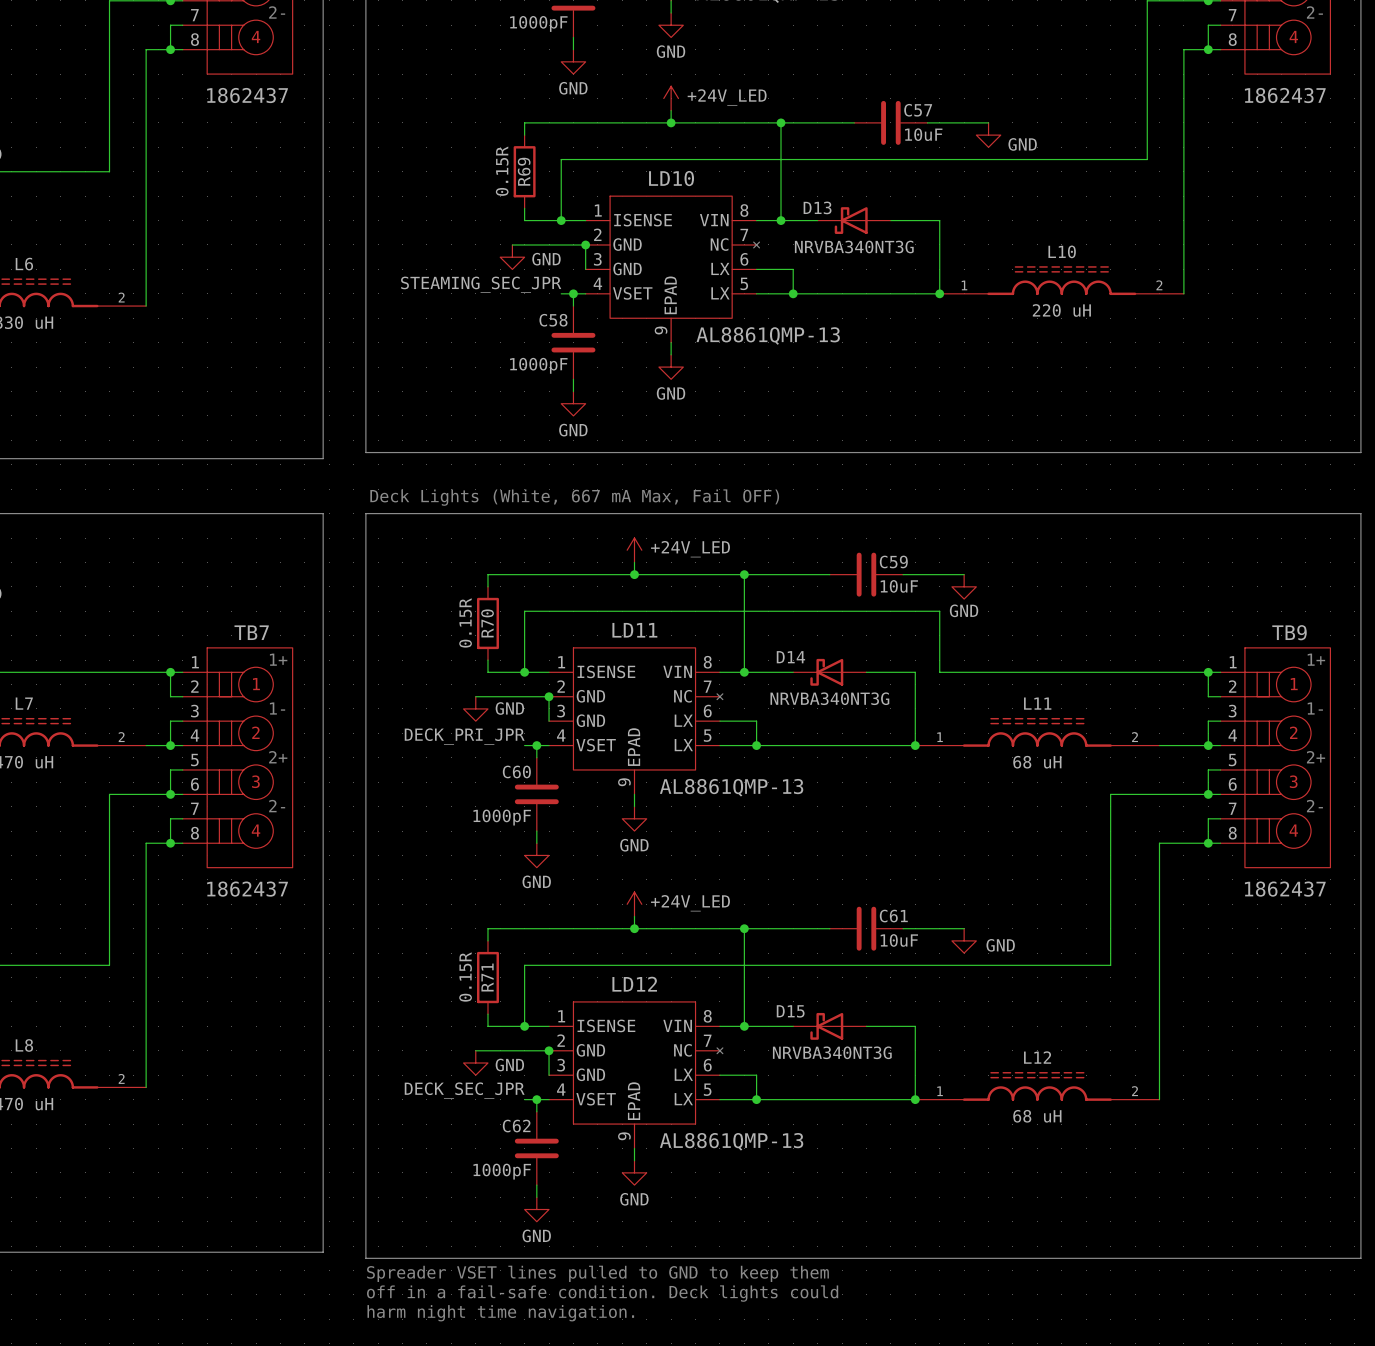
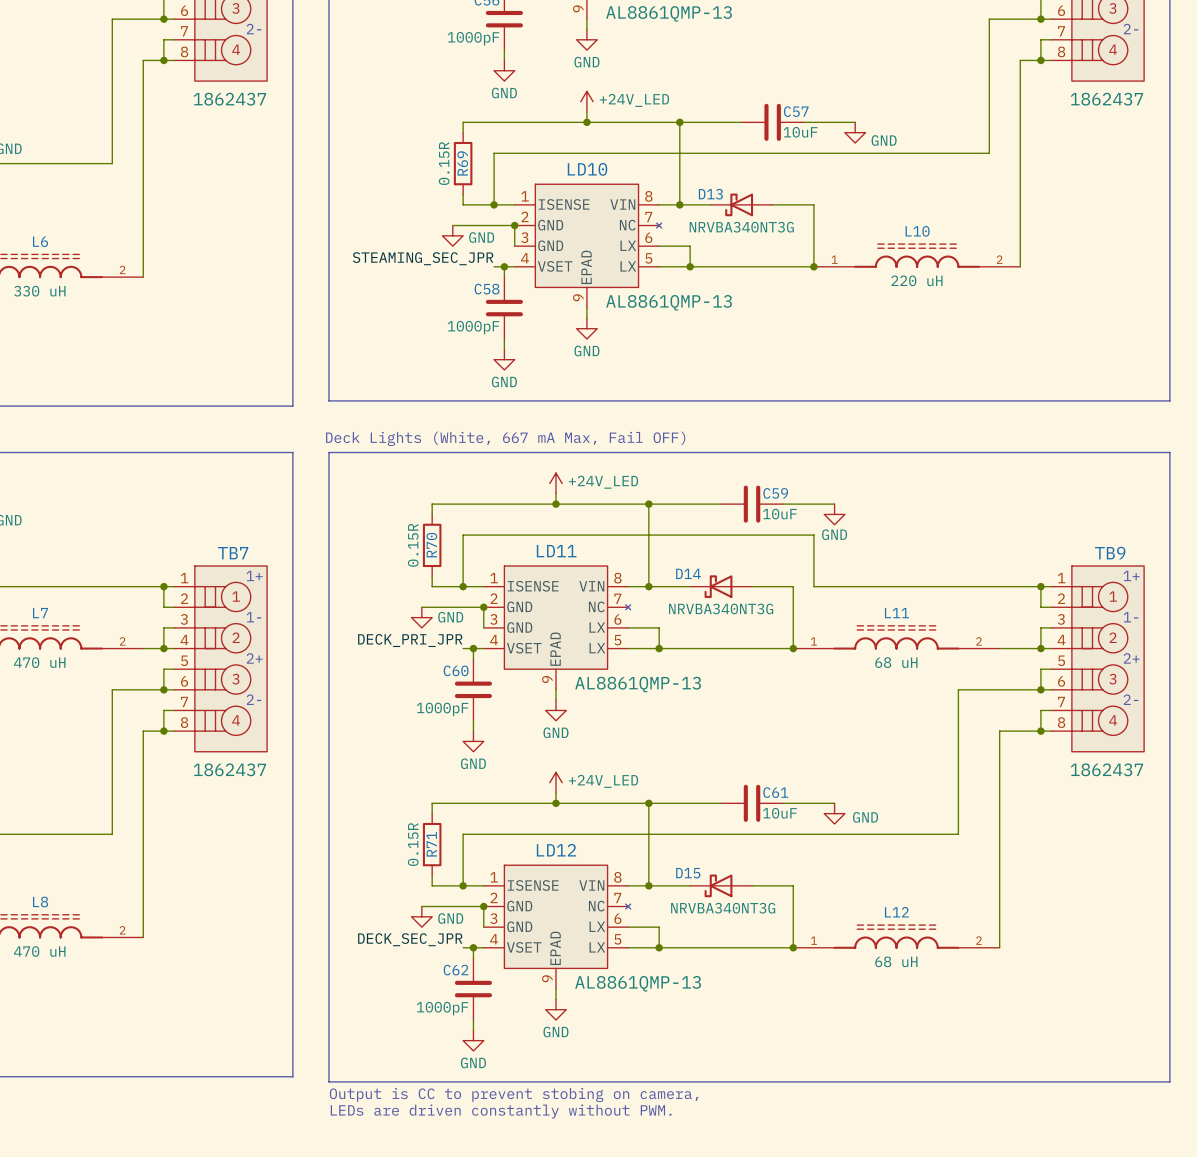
text: Spreader VSET lines pulled to GND to keep them (597, 1273) -> Output is CC to prevent stobing on camera, (514, 1094)
text: off in a fail-safe condition. Deck lights could (602, 1293) -> LEDs are driven constantly without PWM. (501, 1111)
text: harm night time navigation. (500, 1313) -> none

